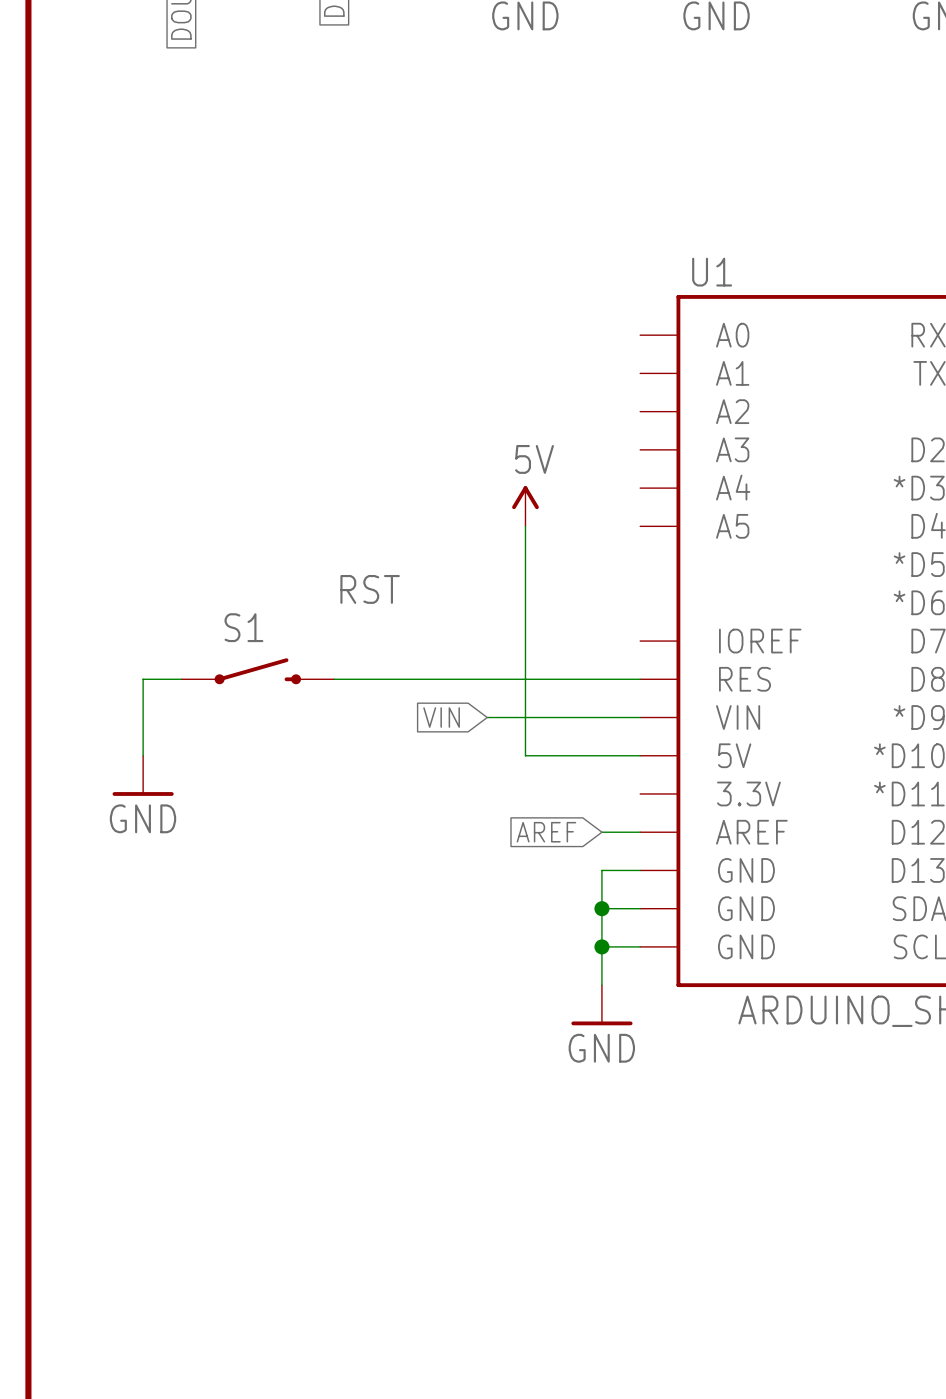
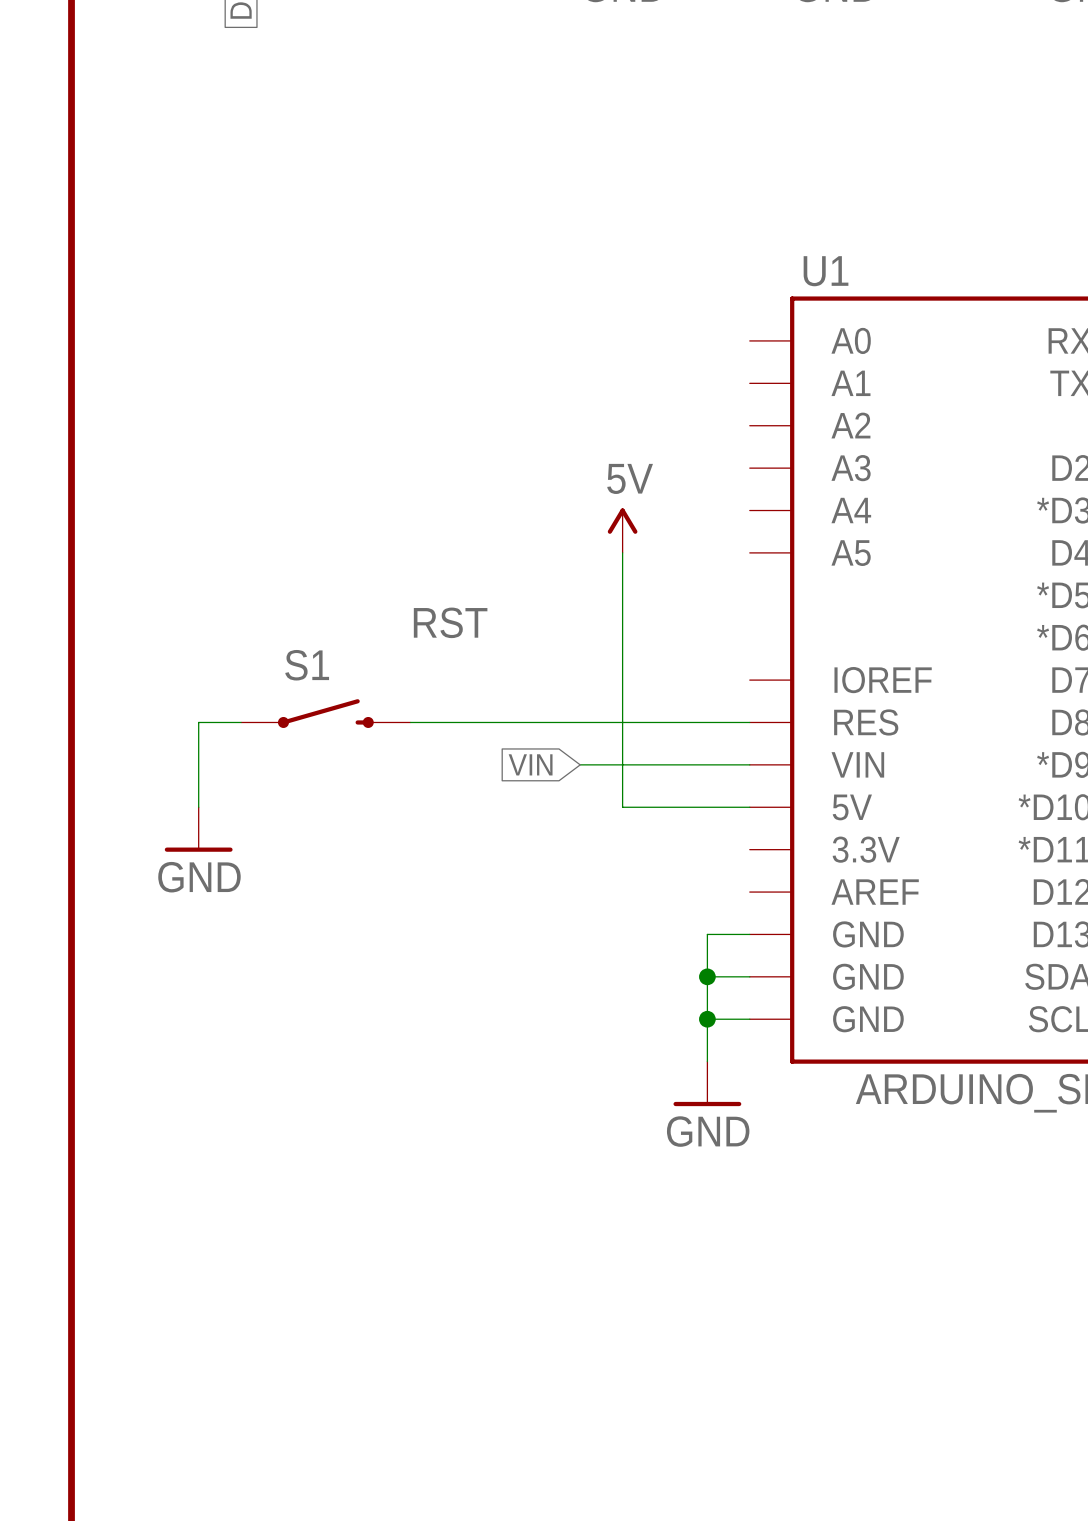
global label: AREF (546, 832) -> none
wire: (601, 832) (640, 832) -> none

